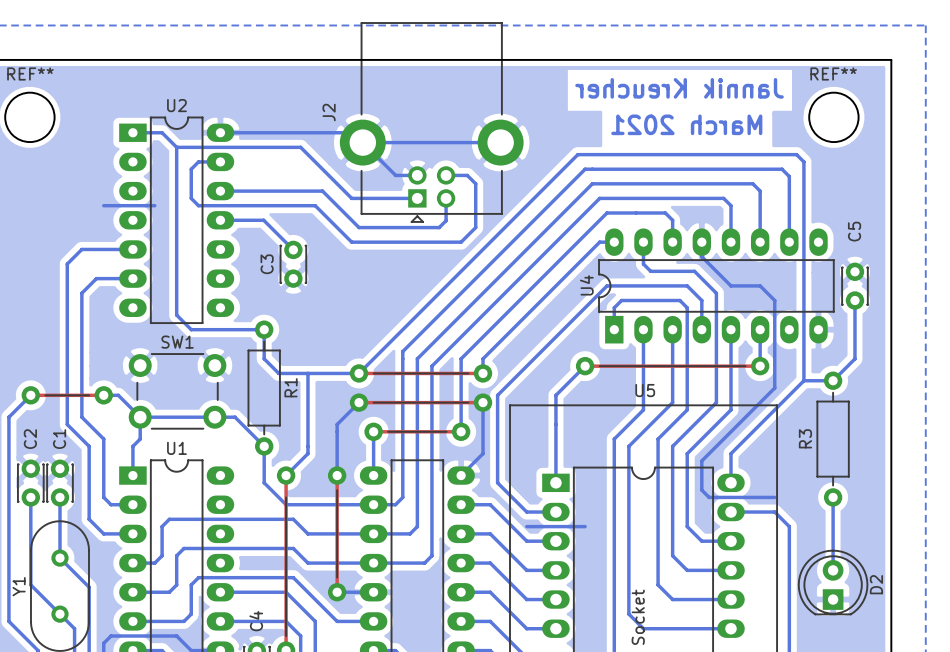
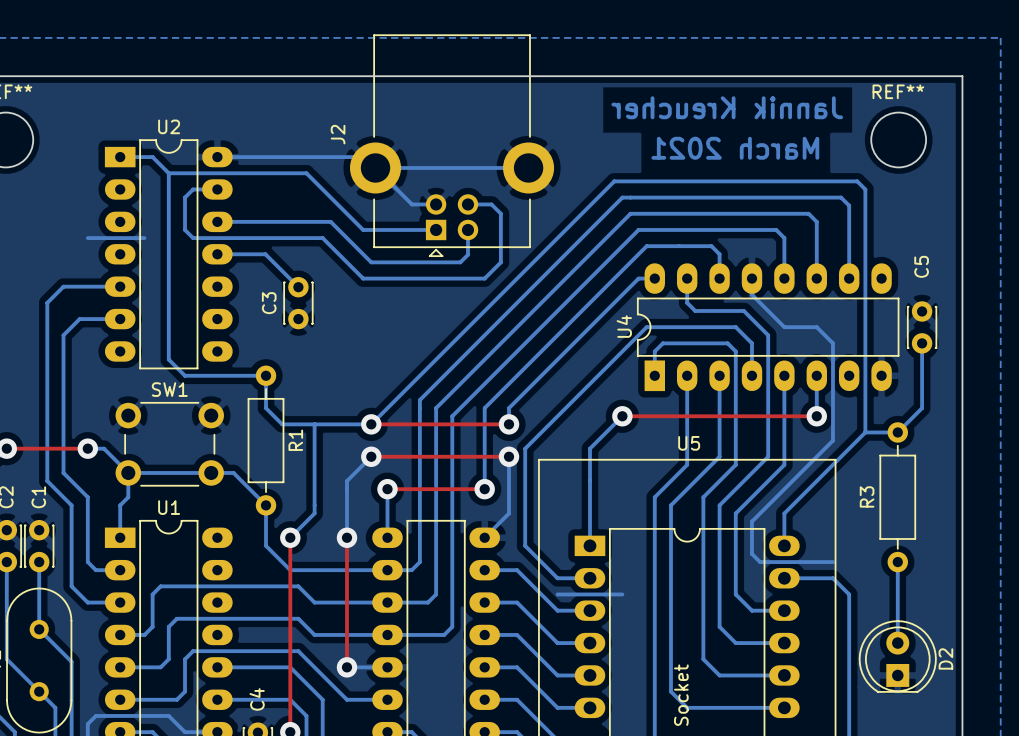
line: (599, 366) (745, 366) -> none
line: (373, 373) (468, 373) -> none
line: (45, 395) (89, 395) -> none
line: (373, 402) (468, 402) -> none
line: (388, 431) (446, 431) -> none
line: (337, 490) (337, 577) -> none
line: (286, 497) (286, 636) -> none

